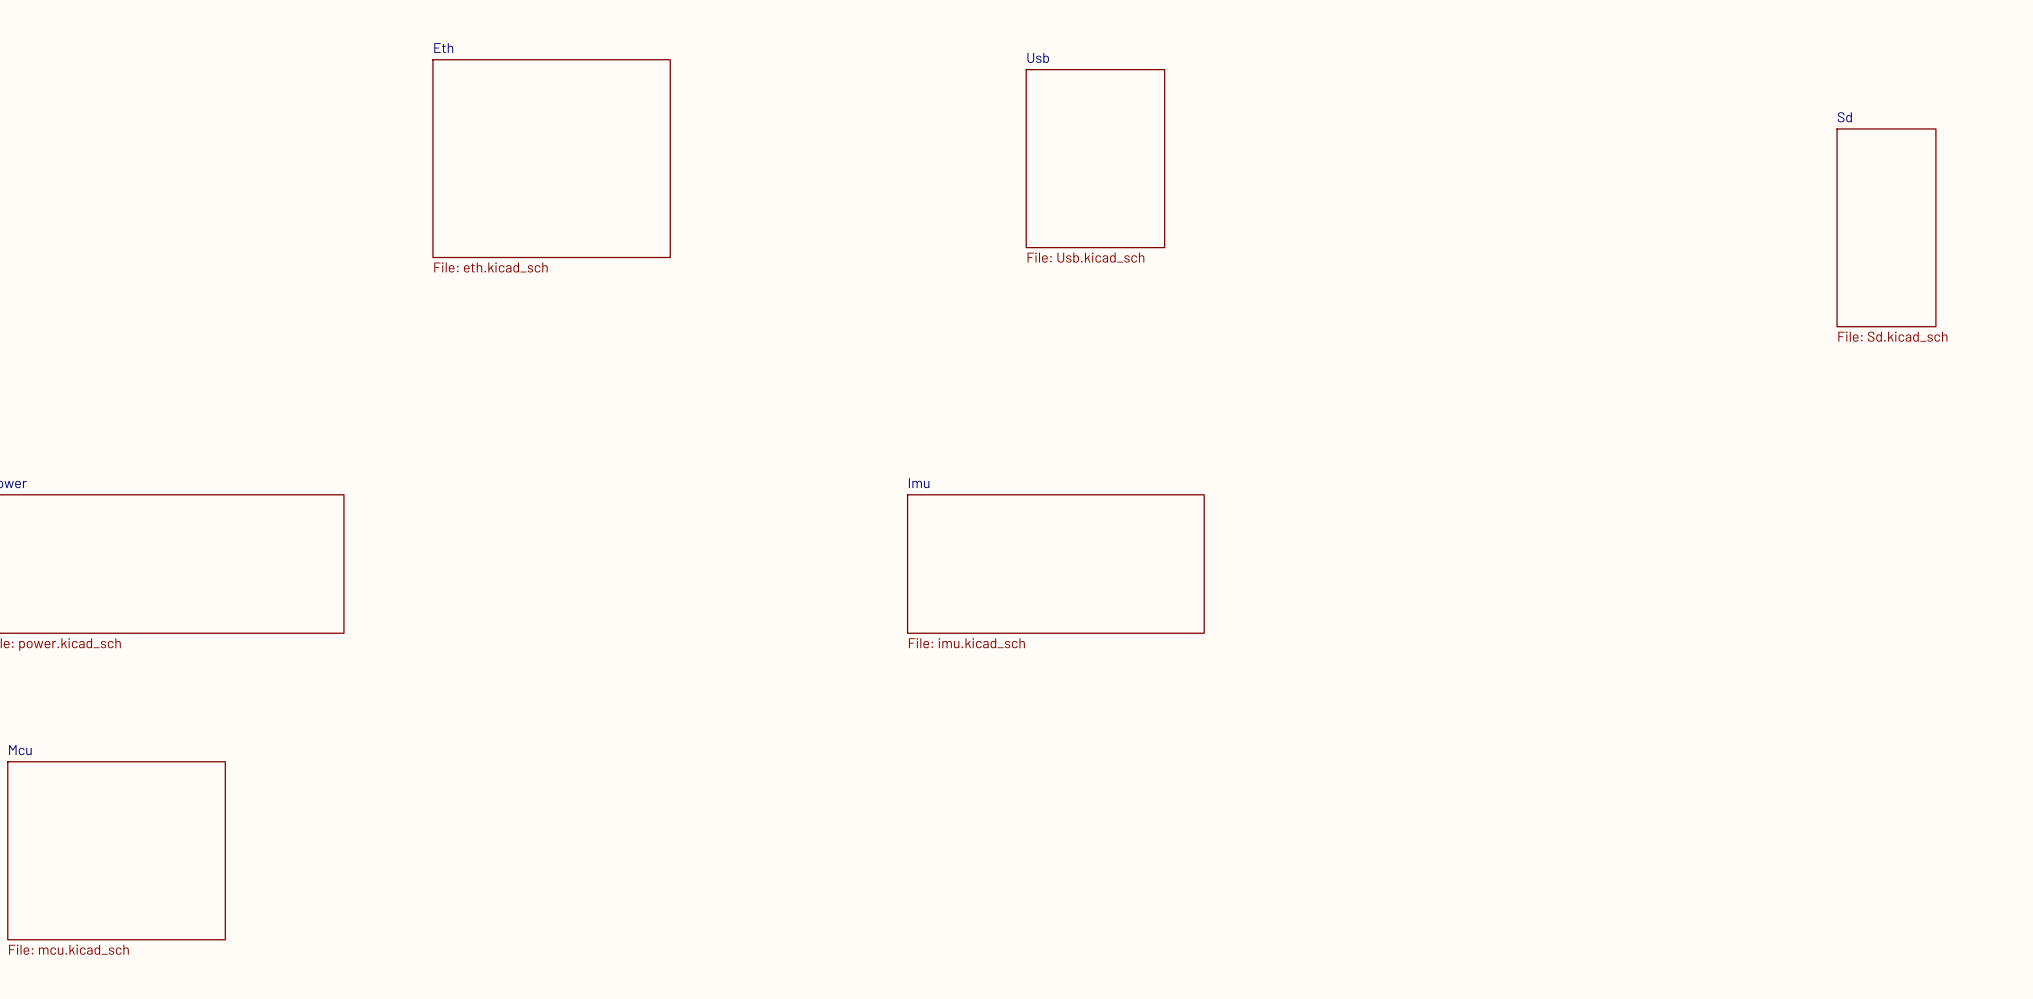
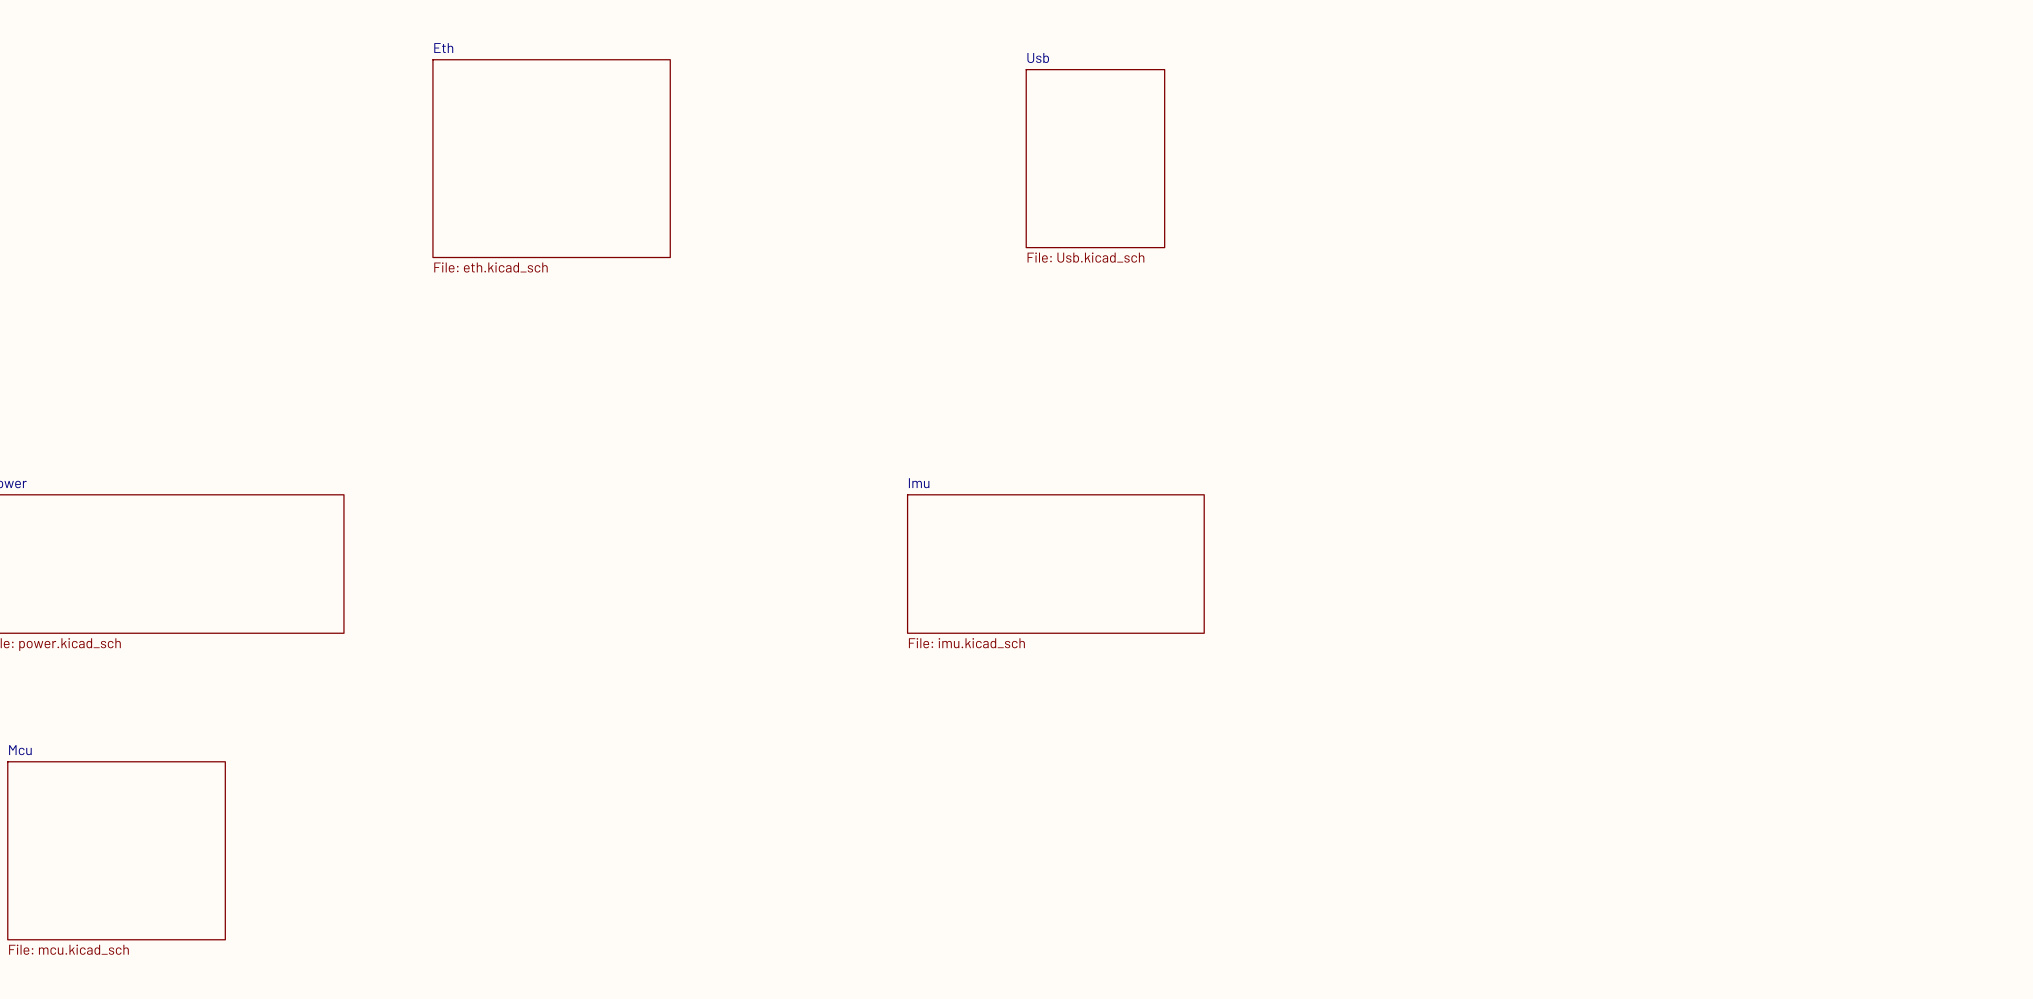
sheet Sd: File: Sd.kicad_sch (1886, 227) -> none

